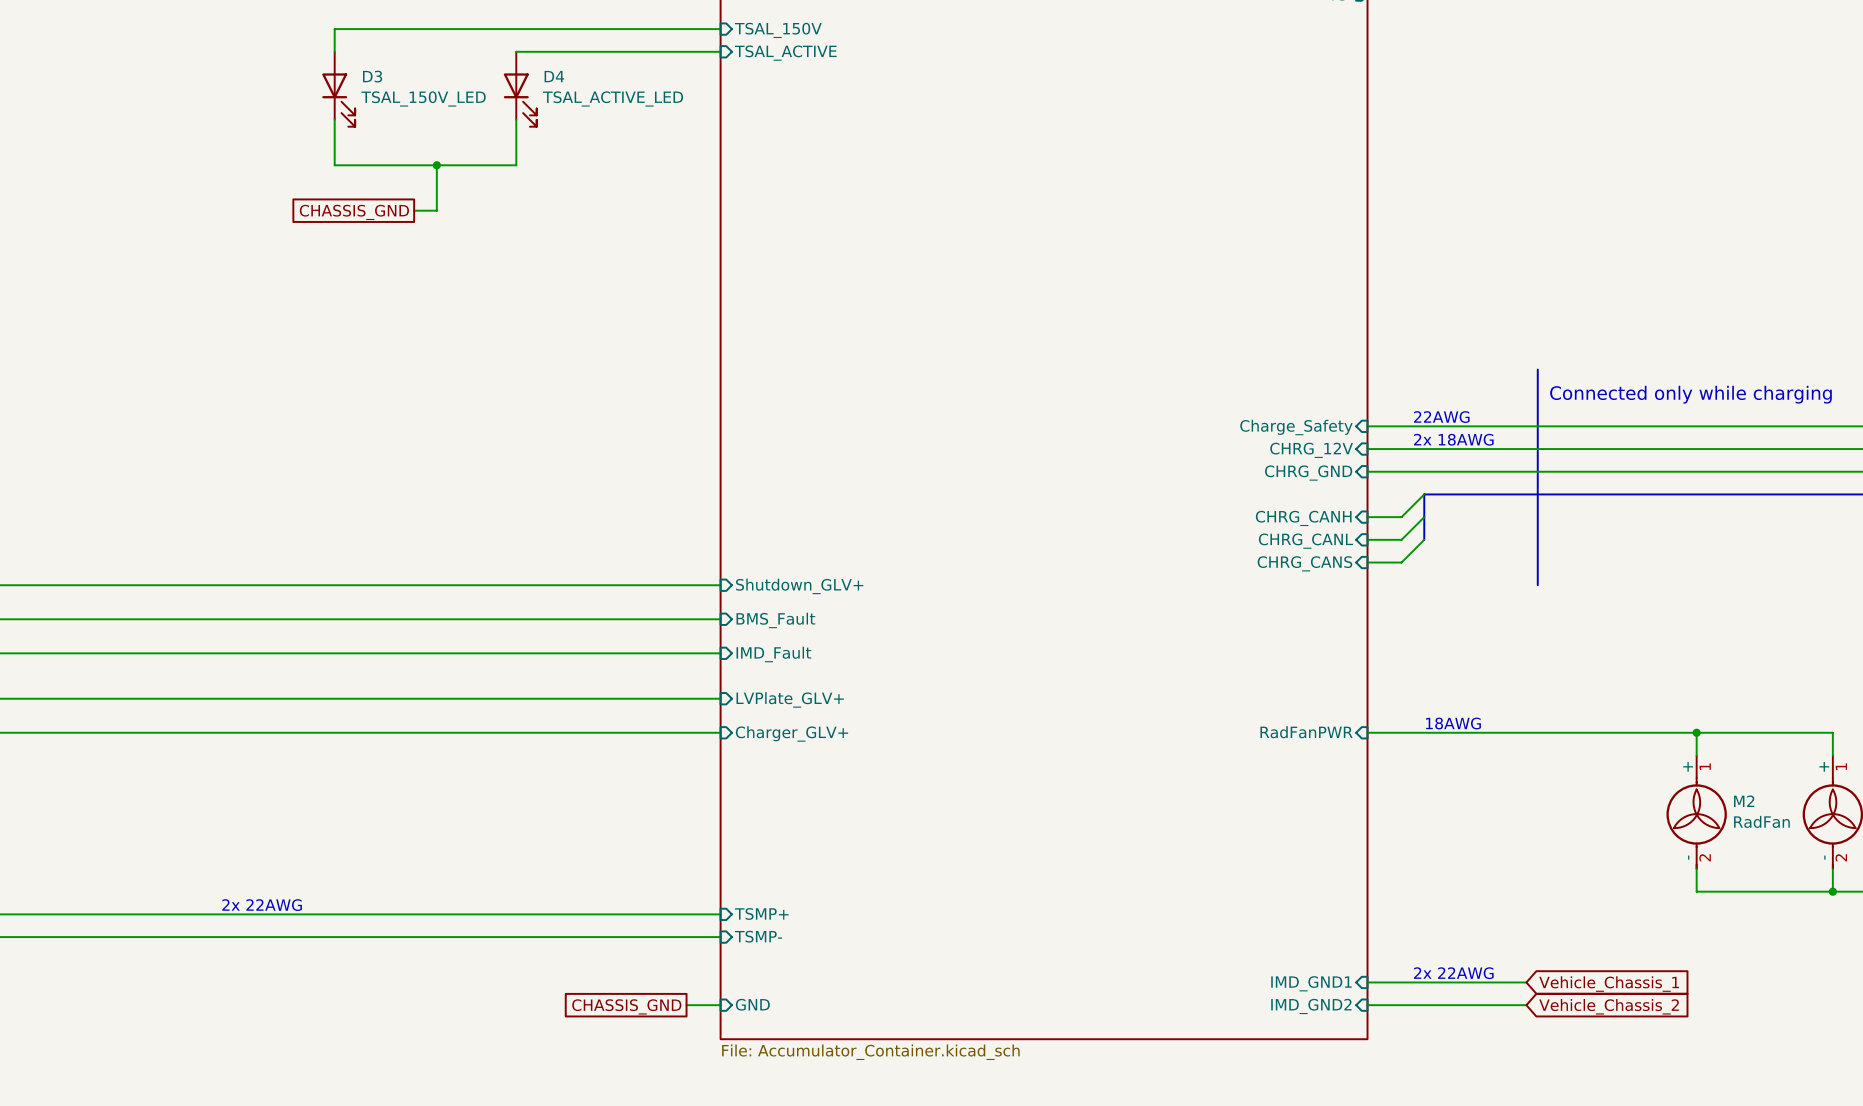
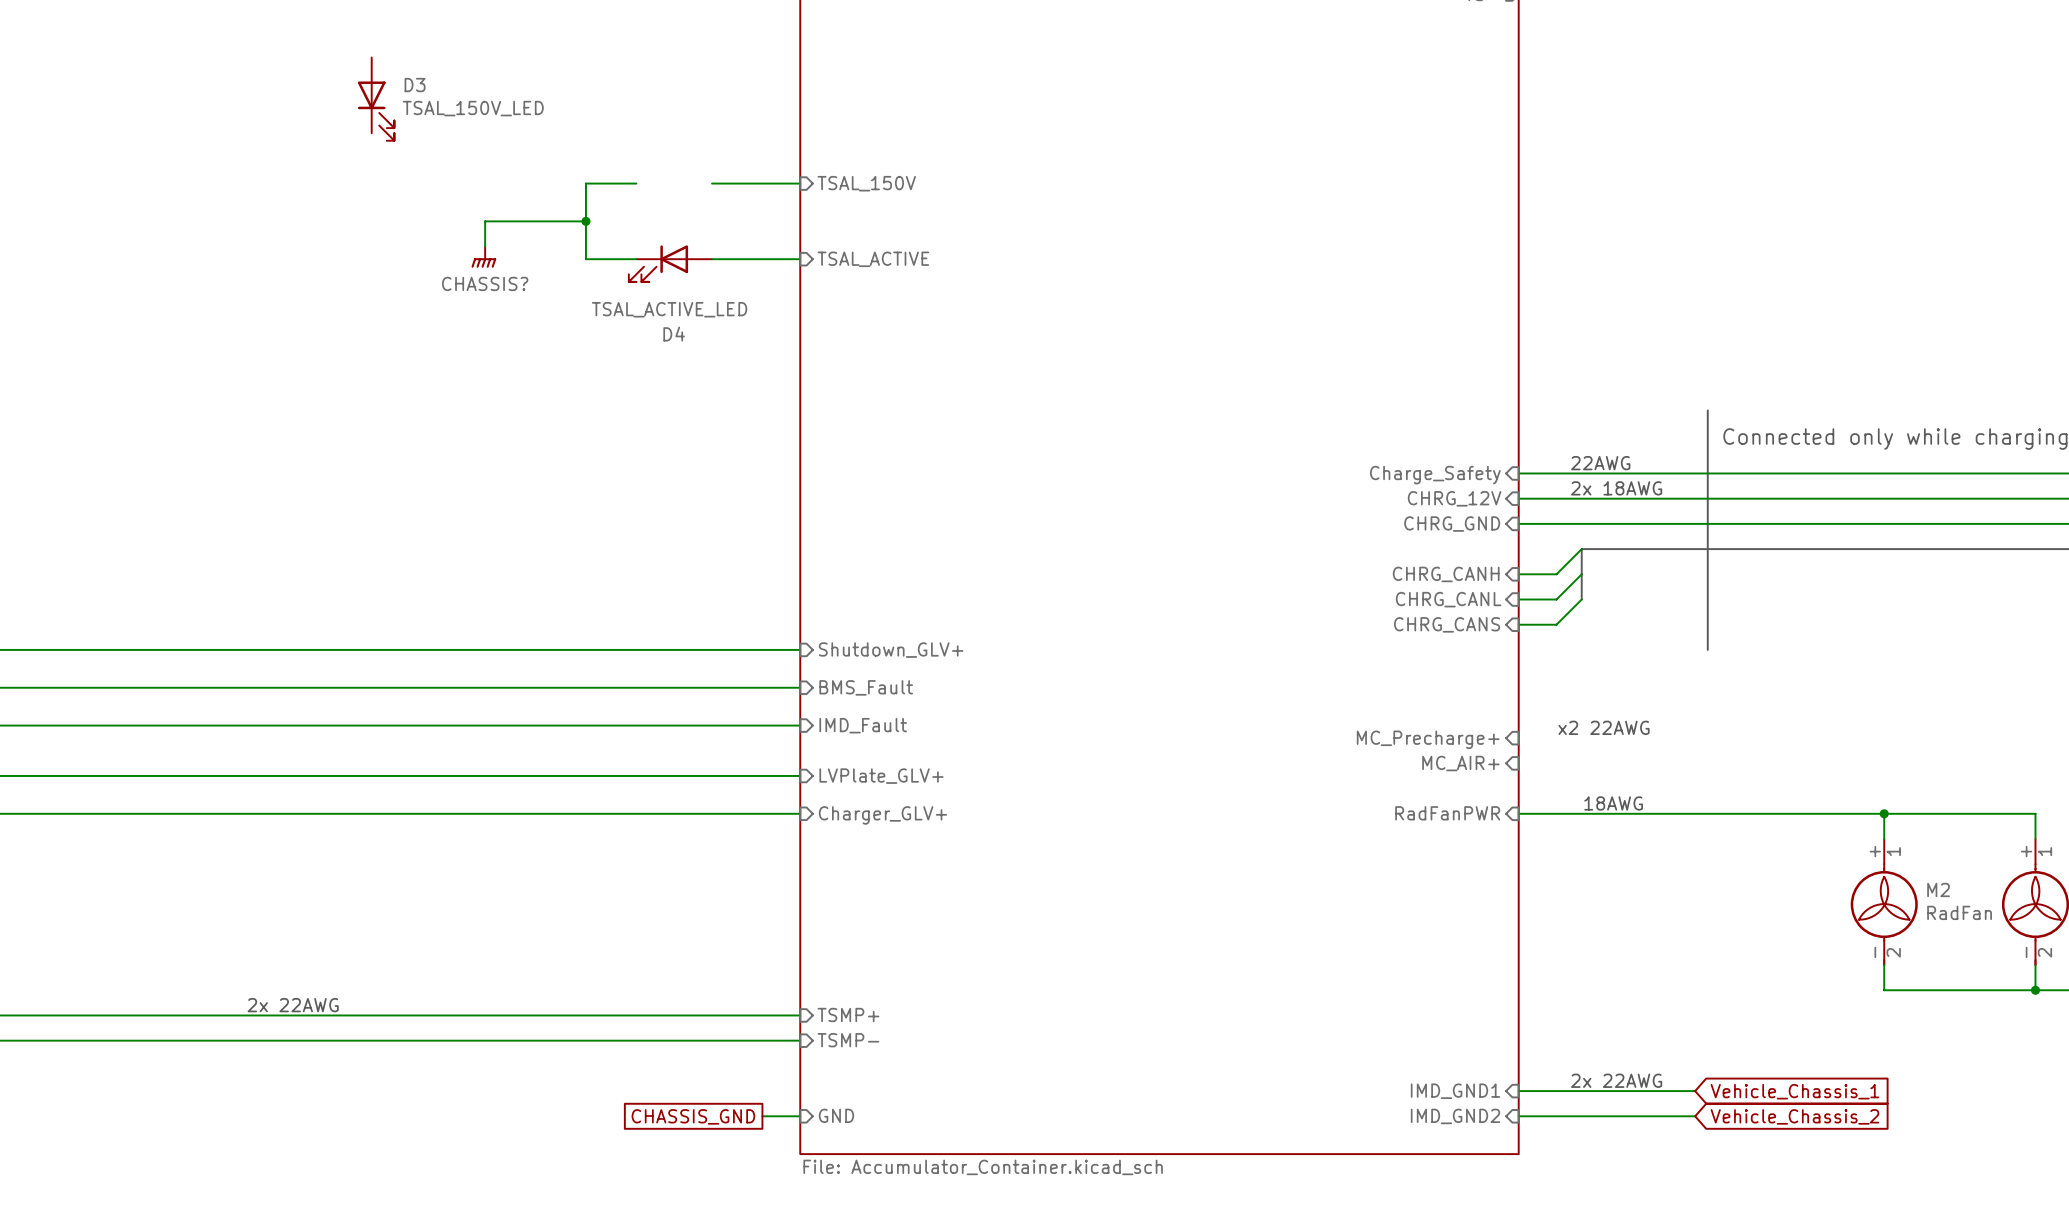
wire: (720, 29) (334, 29) (334, 51) -> none
sheet pin position: TSAL_150V (778, 30) -> TSAL_150V (866, 183)
wire: (516, 51) (720, 51) -> none
sheet pin position: TSAL_ACTIVE (785, 53) -> TSAL_ACTIVE (873, 259)
D4 name position: D4 (554, 76) -> D4 (674, 334)
D4 position: (520, 89) -> (670, 263)
D4 value position: TSAL_ACTIVE_LED (613, 98) -> TSAL_ACTIVE_LED (669, 309)
D4 rotation: 0° (520, 100) -> 90° clockwise (658, 263)
wire: (334, 119) (334, 165) (516, 165) (516, 119) -> none
wire: (436, 165) (436, 199) -> (585, 221) (485, 221)
junction: (436, 165) -> none
wire: none -> (636, 183) (585, 183) (585, 259) (636, 259)
wire: none -> (712, 183) (800, 183)
junction: none -> (585, 221)
wire: (414, 210) (436, 210) -> (485, 246) (485, 233)
global label: CHASSIS_GND (354, 212) -> none
CHASSIS?: none -> (483, 257)
wire: none -> (712, 259) (800, 259)
text: none -> x2 22AWG (1604, 727)
sheet pin: none -> MC_Precharge+ (1428, 739)
sheet pin: none -> MC_AIR+ (1460, 763)

